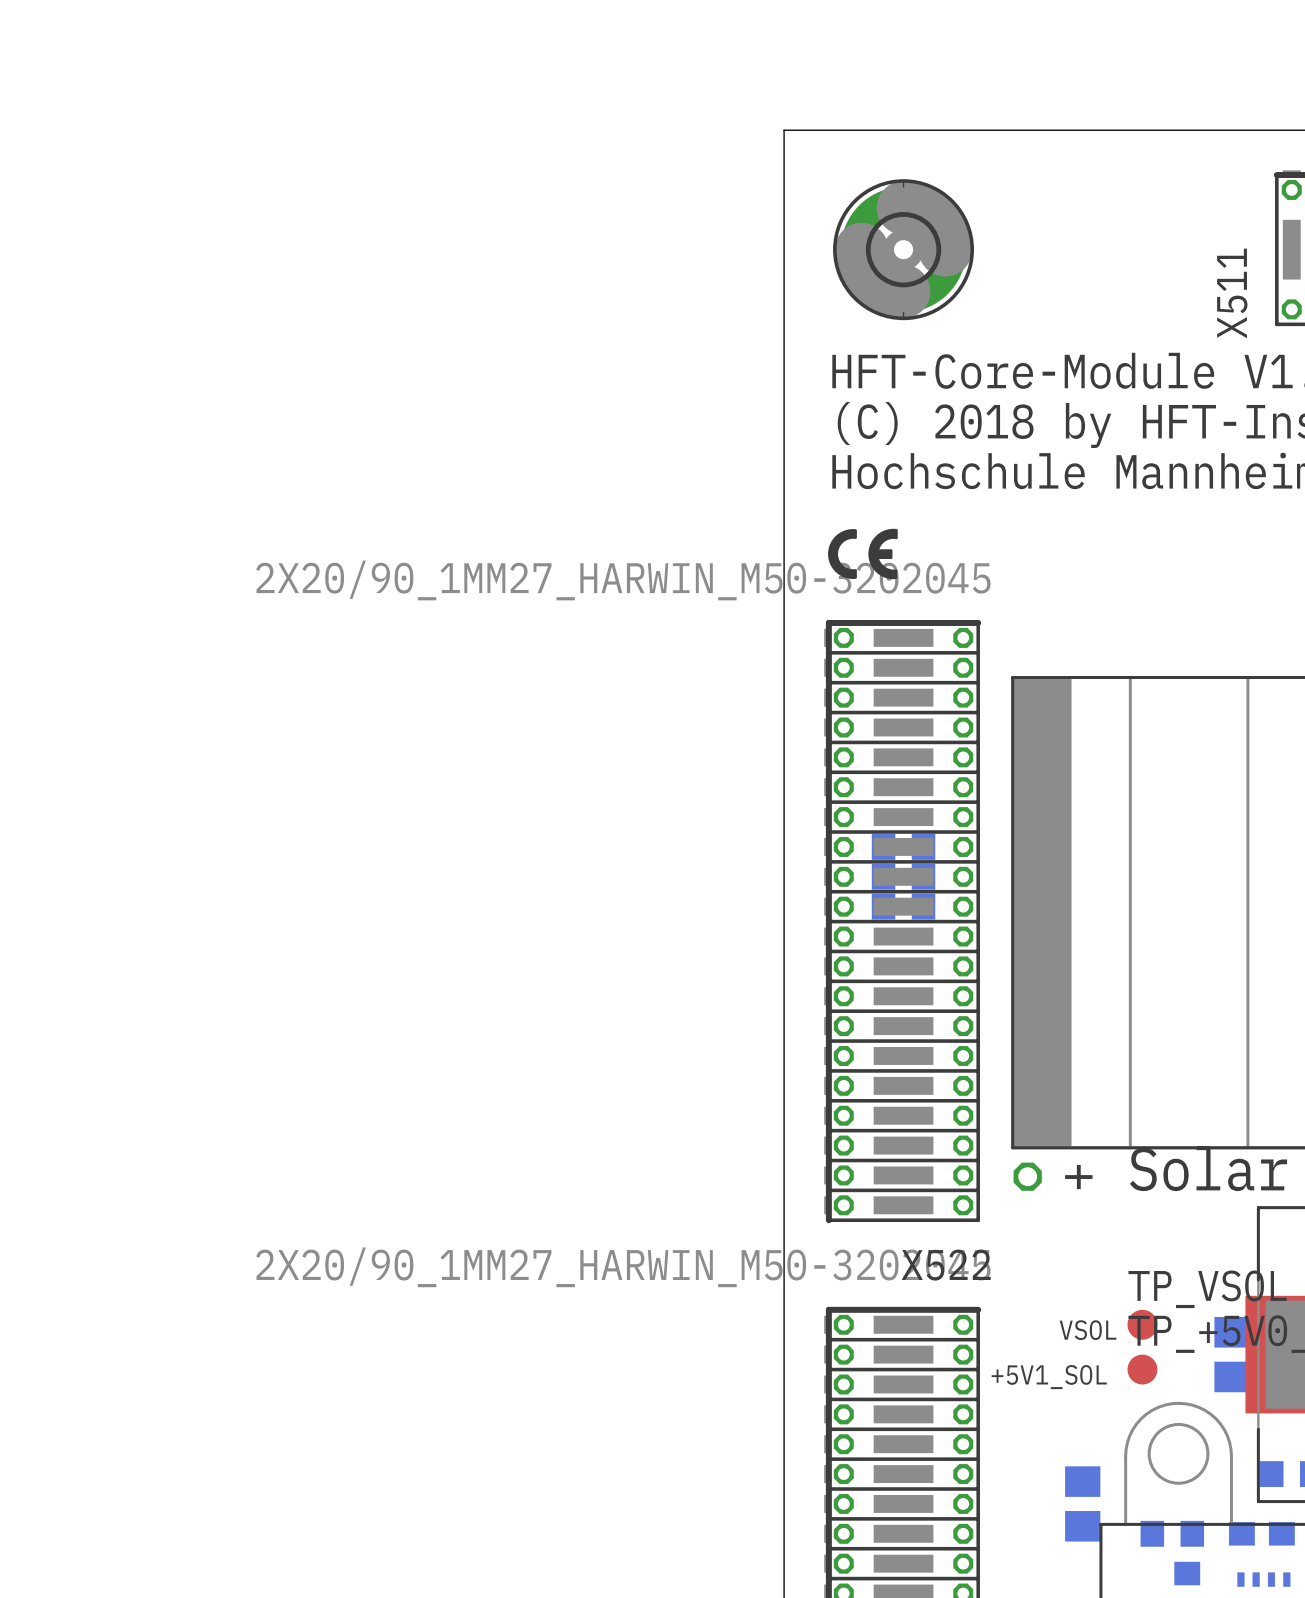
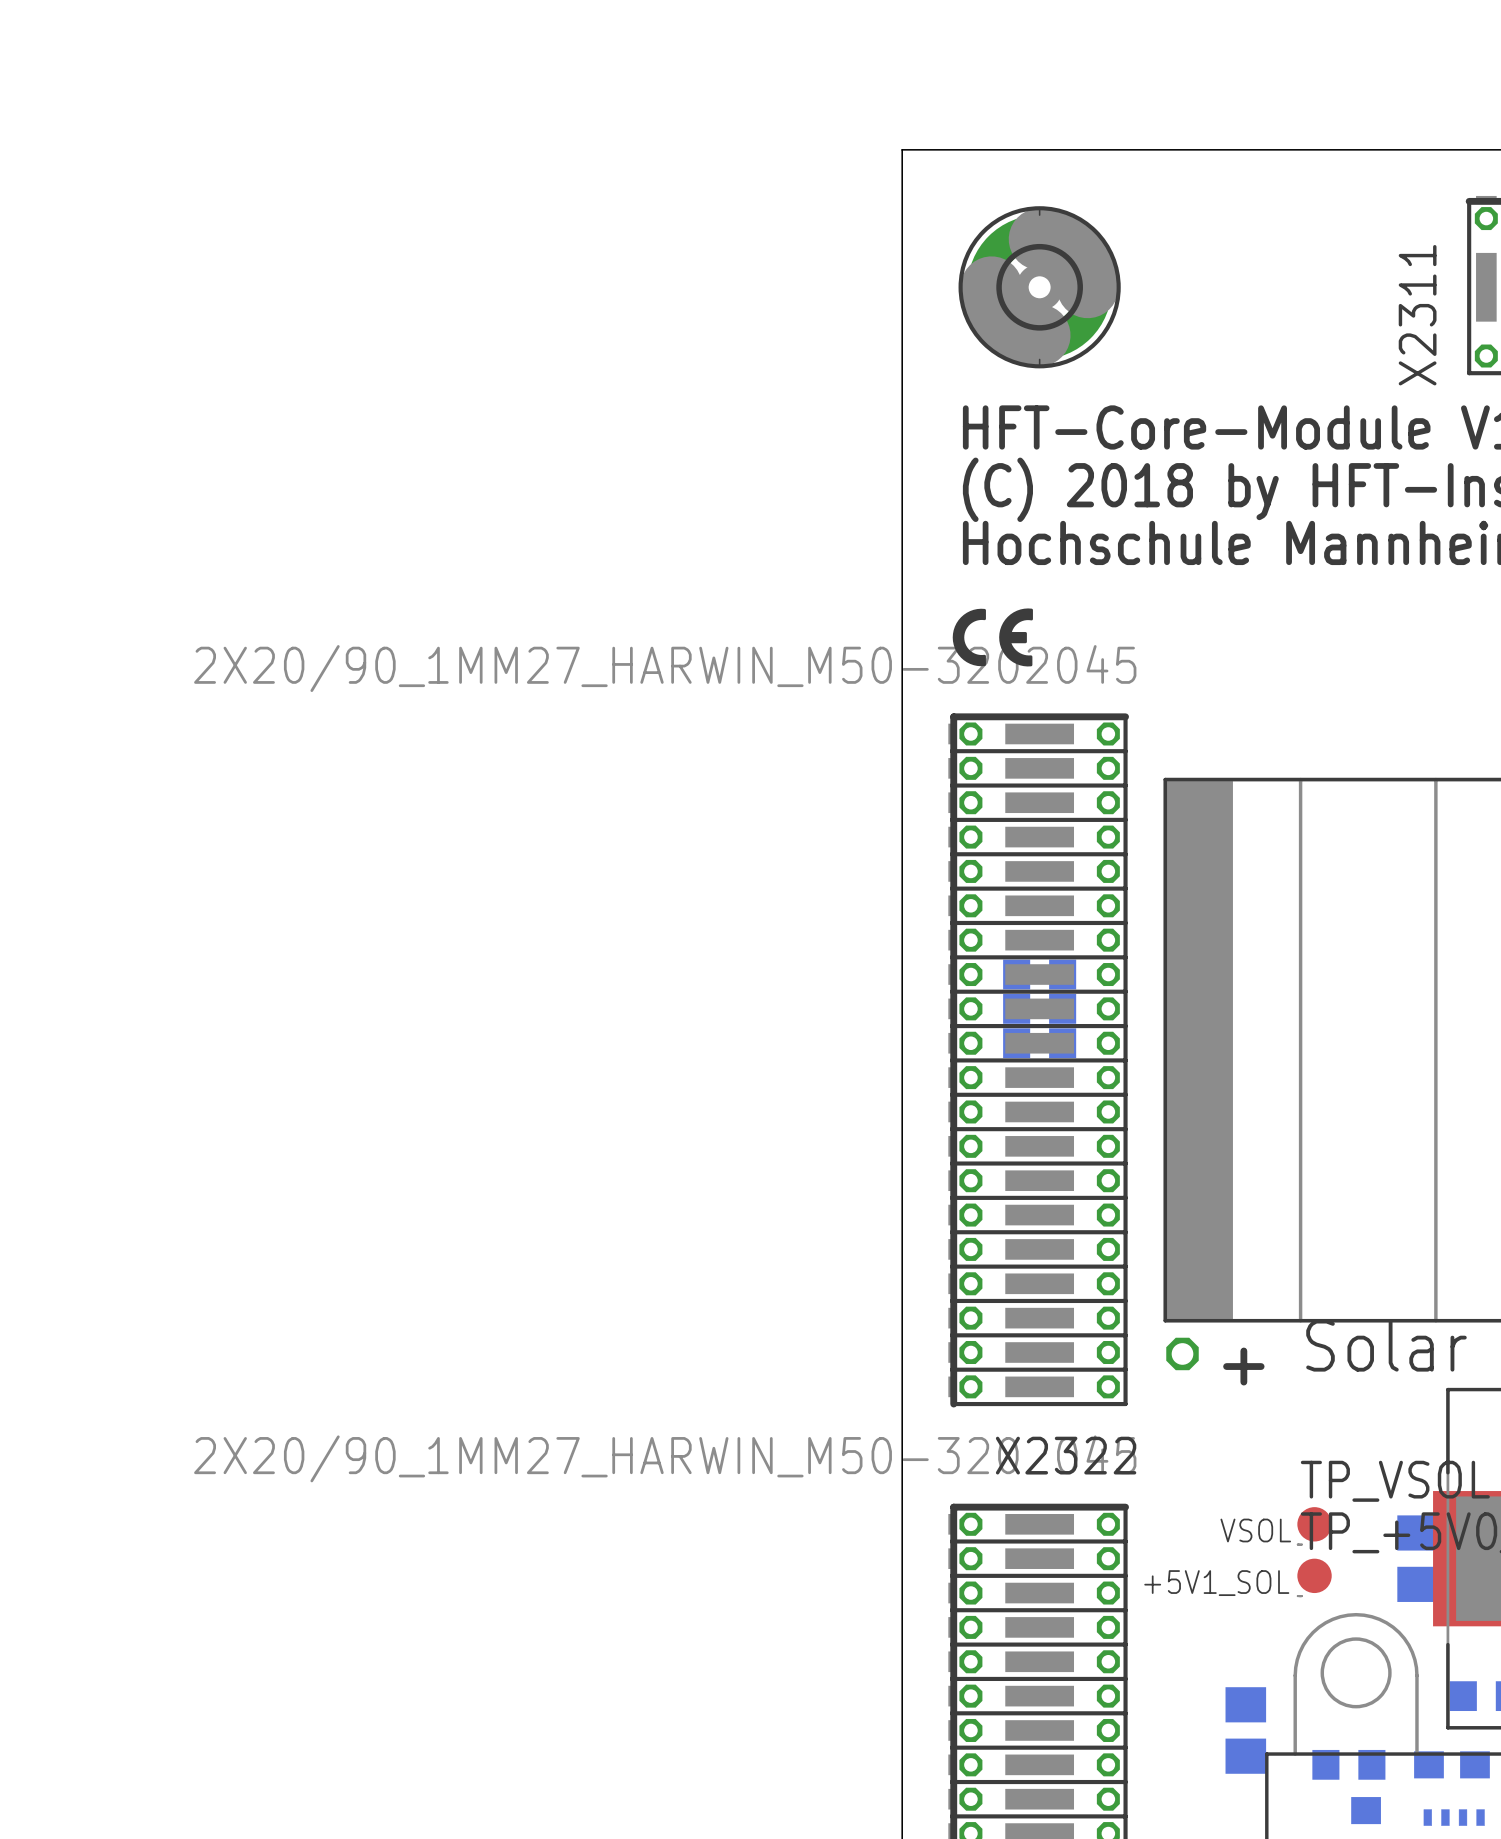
X511 name: X511 (1232, 293) -> X2311 (1417, 315)
X522 name: X522 (946, 1265) -> X2322 (1066, 1455)

